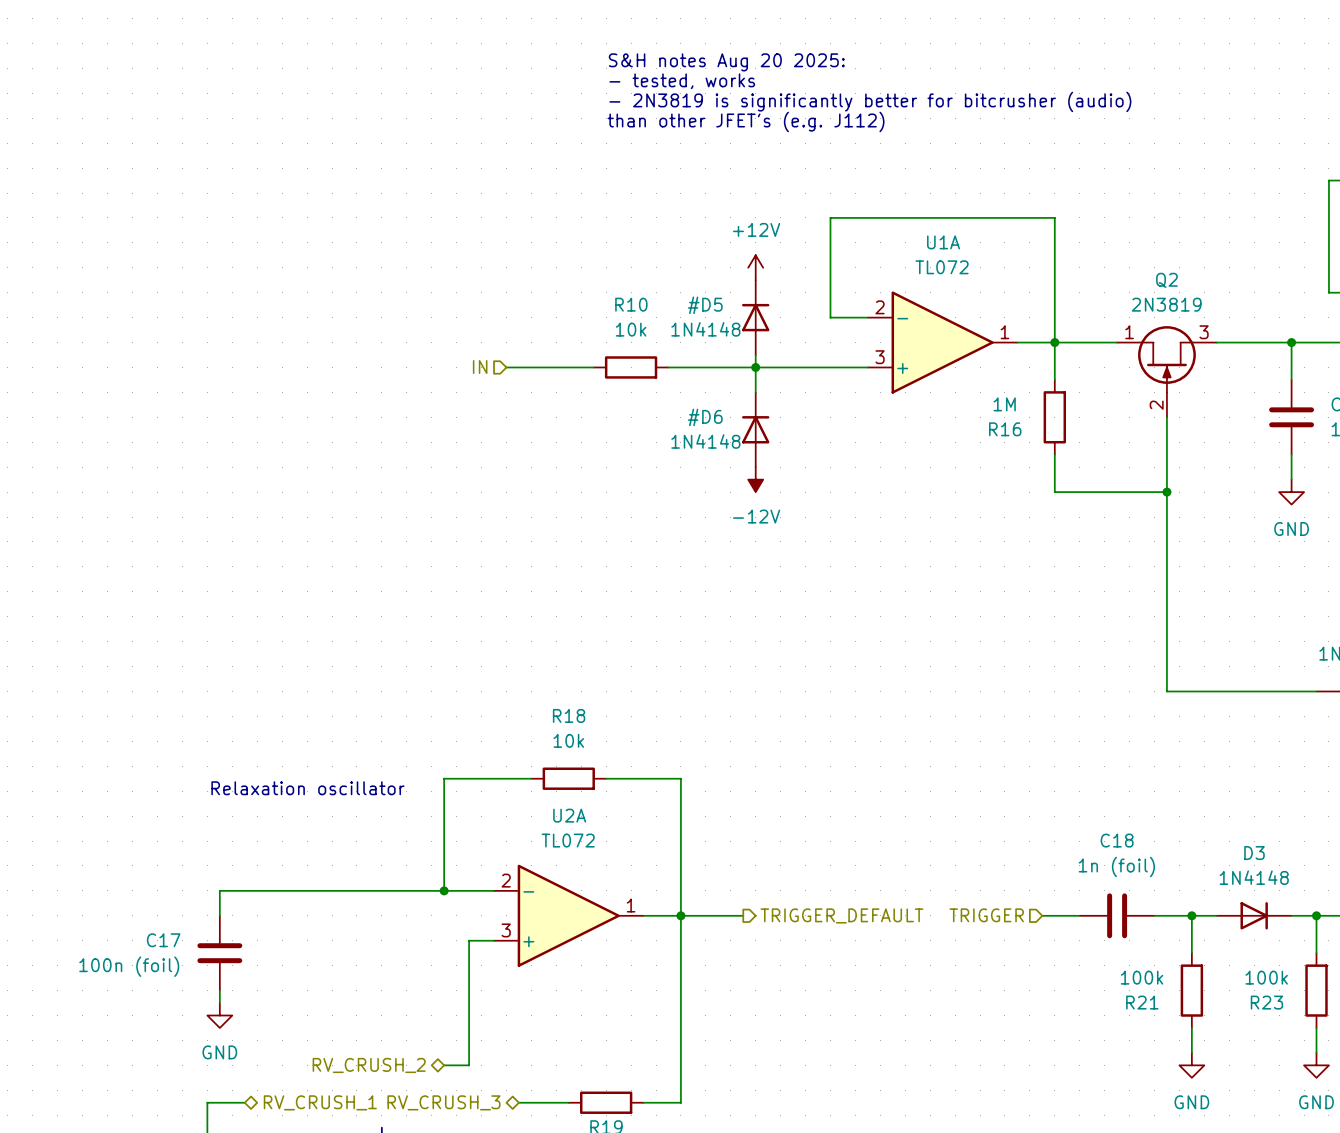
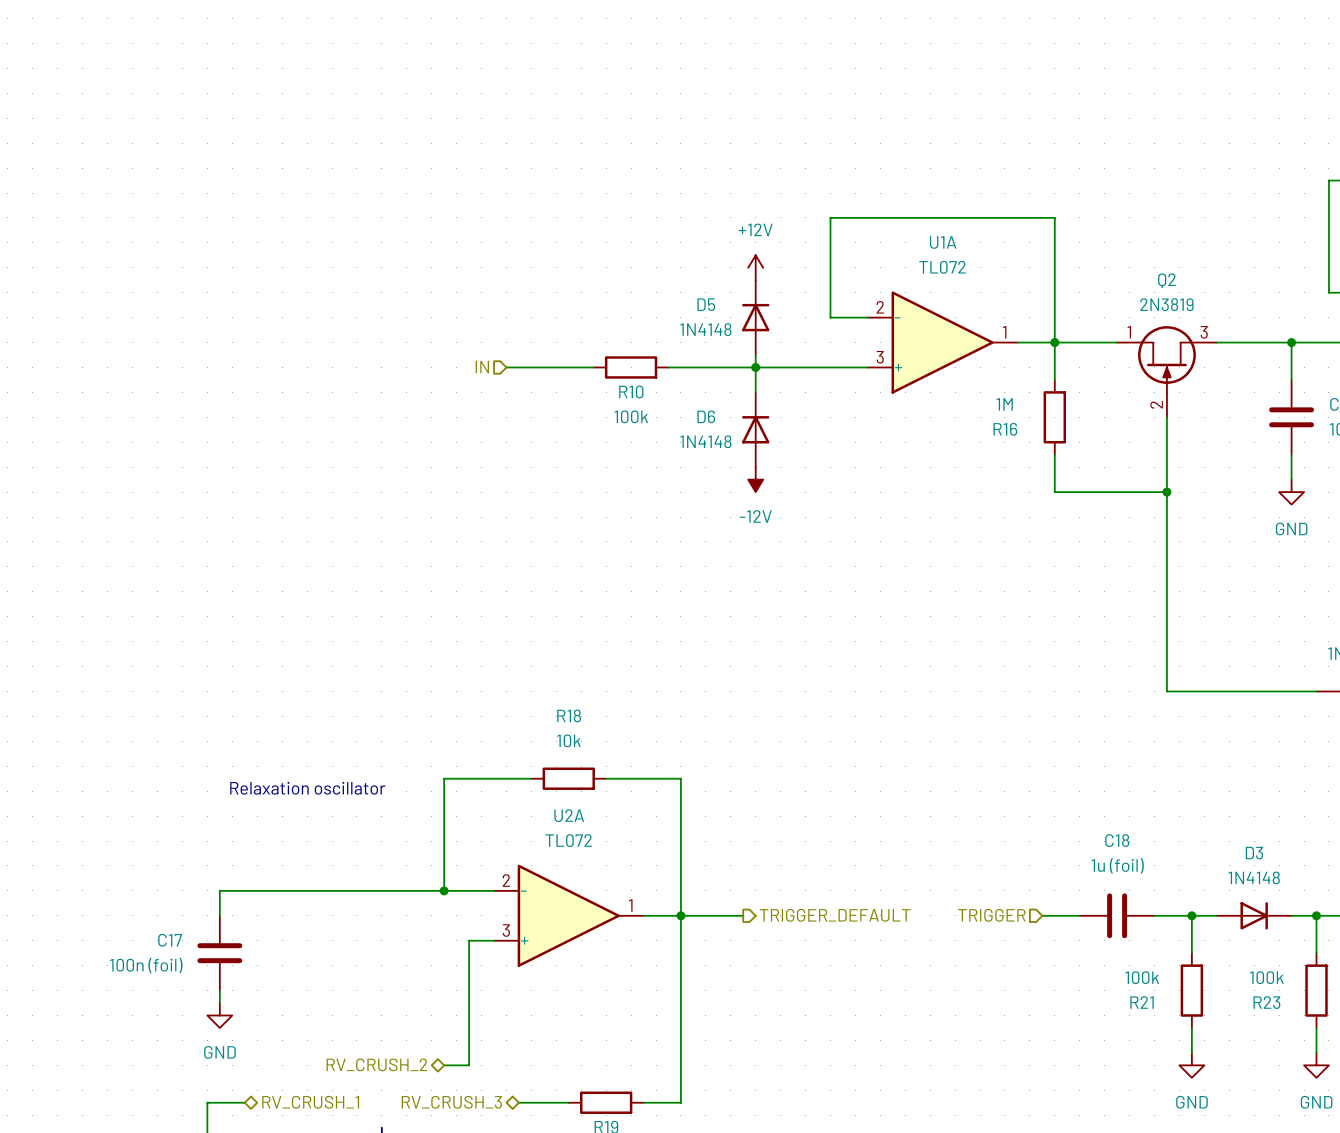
text: S&H notes Aug 20 2025: (726, 62) -> none
text: - tested, works (682, 81) -> none
text: - 2N3819 is significantly better for bitcrusher (audio) (870, 101) -> none
text: than other JFET's (e.g. J112) (746, 121) -> none
R10 name position: R10 (631, 304) -> R10 (631, 391)
D5: none -> 1N4148 (755, 317)
#D5: 1N4148 (755, 317) -> none
R10 value: 10k (631, 329) -> 100k (631, 416)
D6: none -> 1N4148 (755, 429)
#D6: 1N4148 (755, 429) -> none
C18 value: 1n (foil) (1116, 866) -> 1u (foil) (1117, 865)

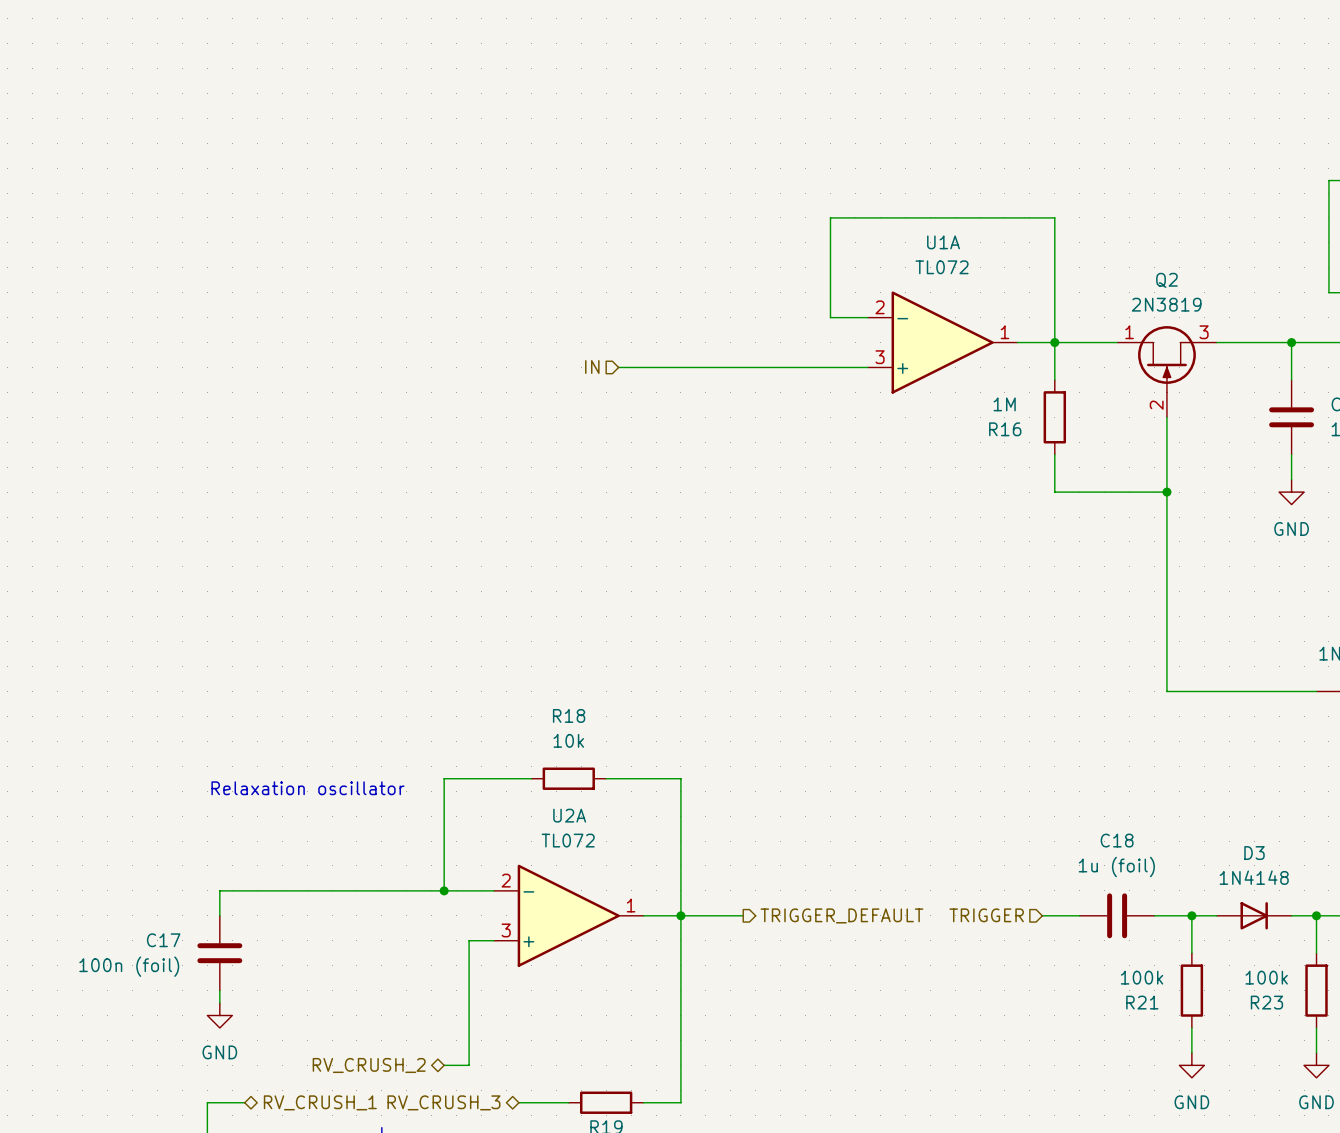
power symbol: +12V (755, 267) -> none
D5: 1N4148 (755, 317) -> none
wire: (755, 355) (755, 392) -> none
hierarchical label position: IN (482, 367) -> IN (592, 367)
wire: (506, 367) (593, 367) -> none
wire: none -> (618, 367) (668, 367)
R10: 100k (631, 367) -> none
junction: (755, 367) -> none
D6: 1N4148 (755, 429) -> none
power symbol: -12V (755, 479) -> none

